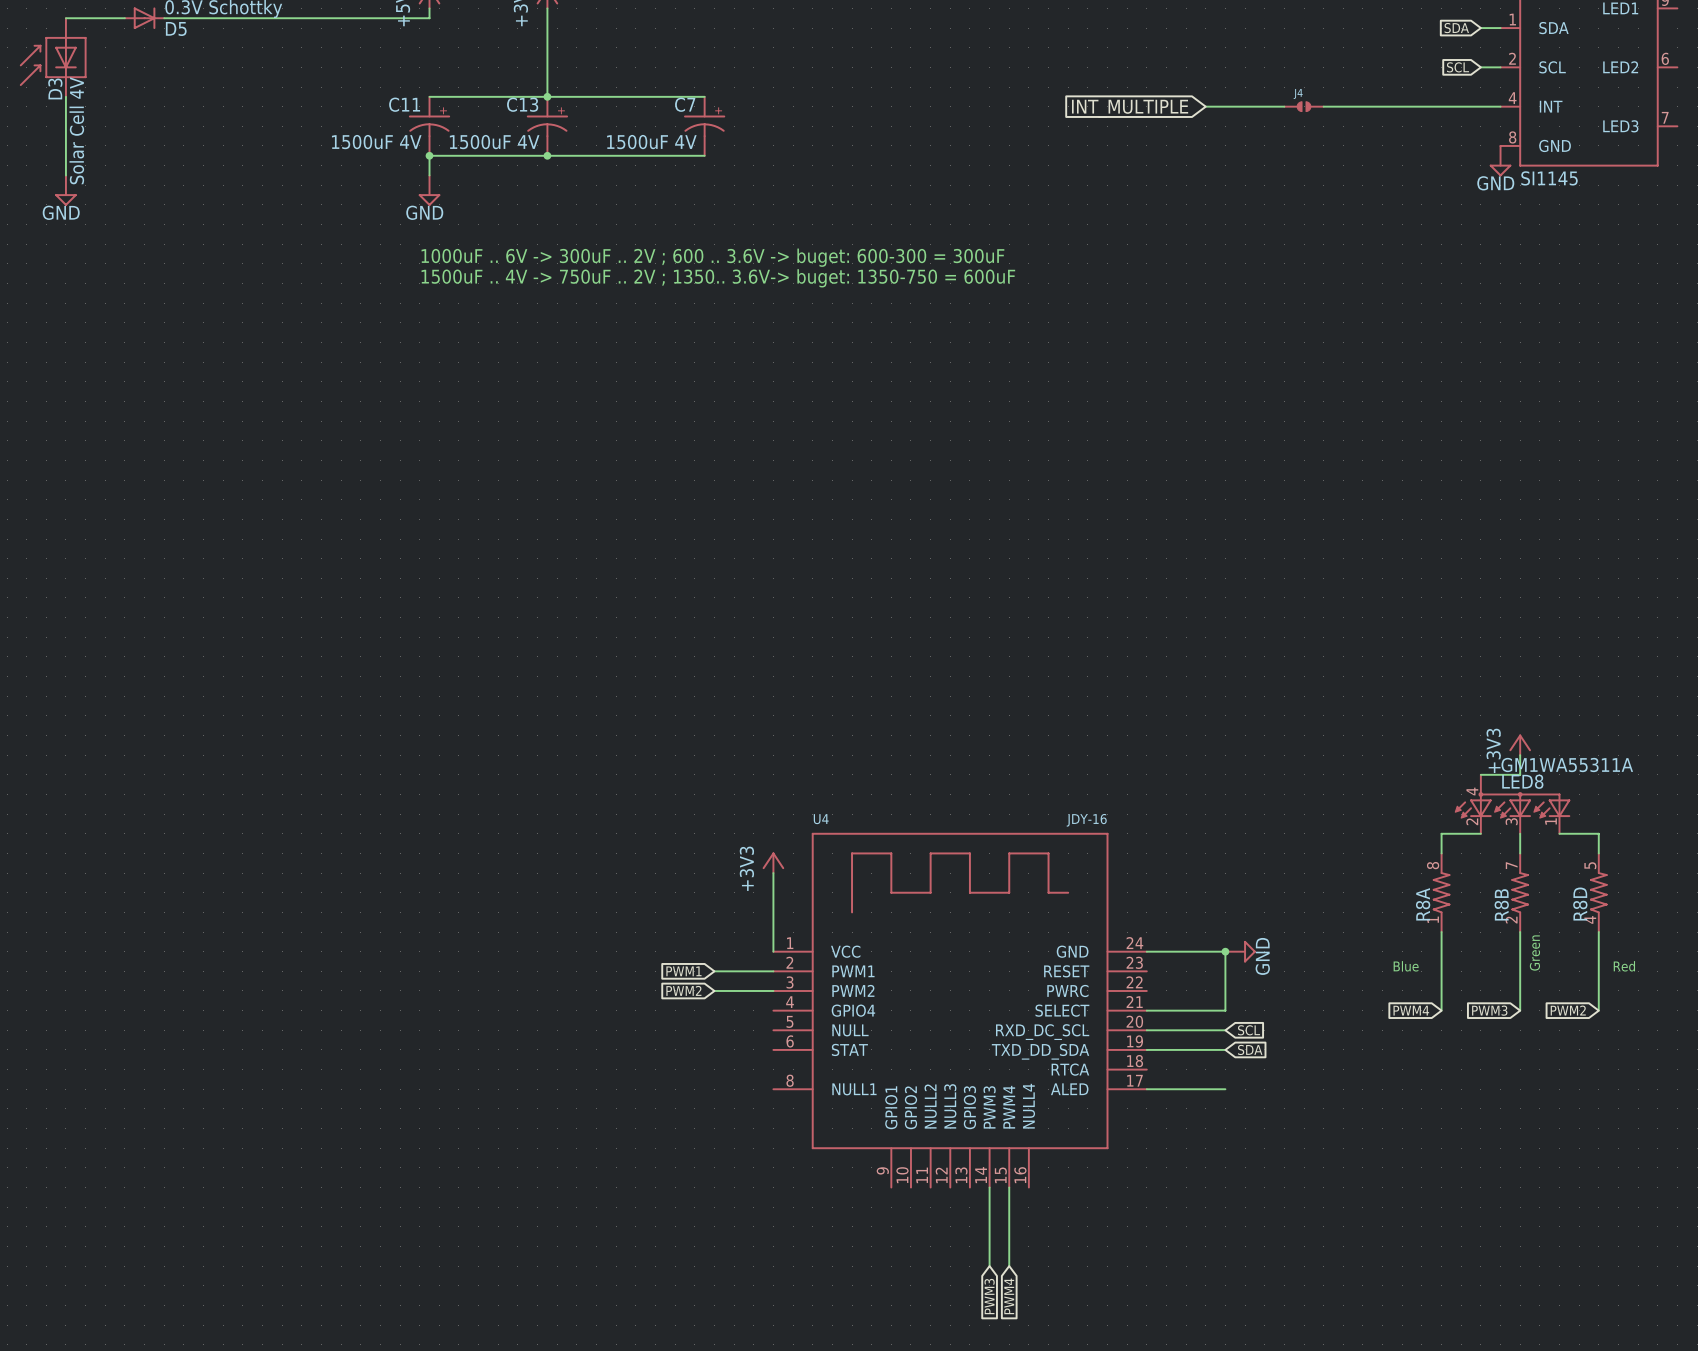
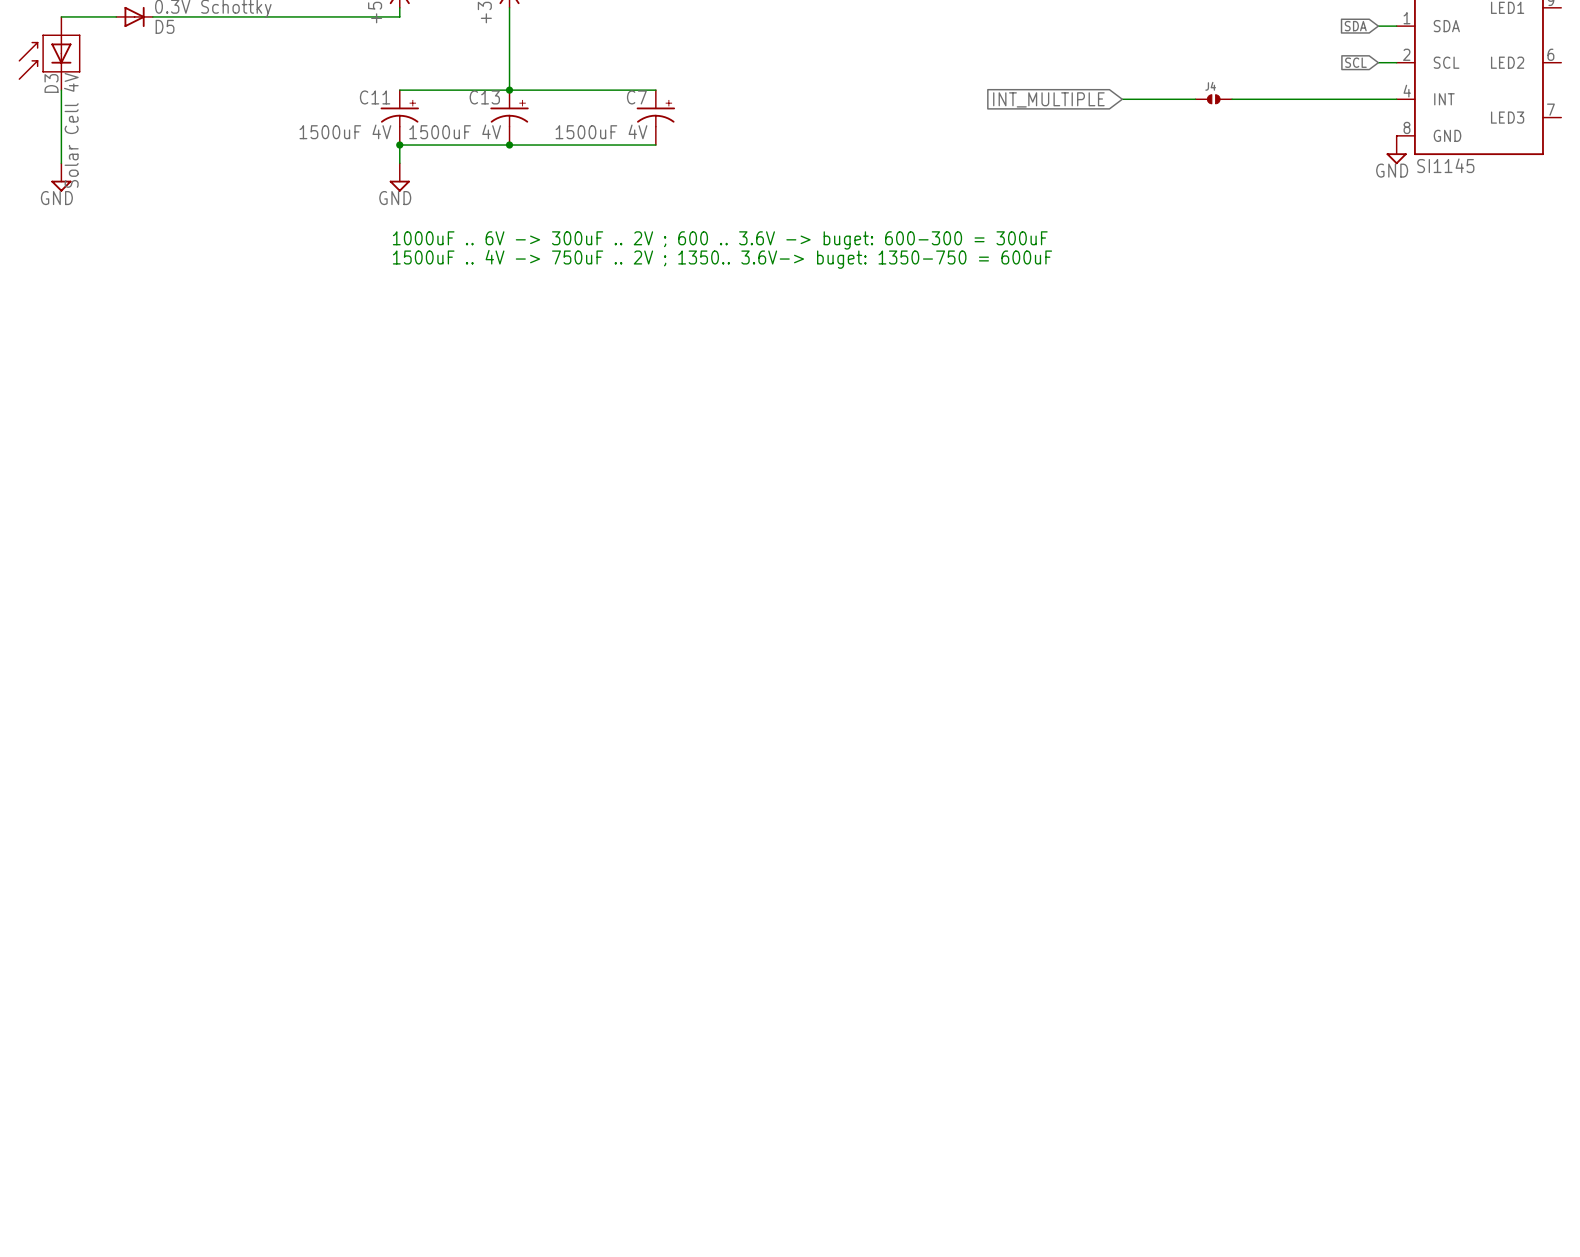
power symbol: +3V3 (1520, 744) -> none
wire: (1520, 755) (1520, 774) (1480, 774) -> none
LED8: GM1WA55311A (1512, 804) -> none
wire: (1480, 833) (1441, 833) (1441, 853) -> none
wire: (1520, 833) (1520, 853) -> none
wire: (1559, 833) (1598, 833) (1598, 853) -> none
power symbol: +3V3 (773, 862) -> none
wire: (773, 873) (773, 951) -> none
R8A: (1441, 892) -> none
R8B: (1520, 892) -> none
R8D: (1598, 892) -> none
wire: (1441, 932) (1441, 1010) -> none
wire: (1520, 932) (1520, 1010) -> none
wire: (1598, 932) (1598, 1010) -> none
wire: (1146, 951) (1225, 951) (1225, 1010) (1146, 1010) -> none
junction: (1225, 951) -> none
power symbol: GND (1240, 951) -> none
text: Green (1534, 953) -> none
text: Blue (1406, 966) -> none
text: Red (1624, 966) -> none
global label: PWM1 (683, 971) -> none
wire: (714, 971) (773, 971) -> none
global label: PWM2 (683, 990) -> none
wire: (714, 990) (773, 990) -> none
U4: JDY-16 (960, 1010) -> none
global label: PWM4 (1411, 1010) -> none
global label: PWM3 (1489, 1010) -> none
global label: PWM2 (1568, 1010) -> none
wire: (1146, 1030) (1225, 1030) -> none
global label: SCL (1249, 1030) -> none
wire: (1146, 1049) (1225, 1049) -> none
global label: SDA (1250, 1049) -> none
wire: (1146, 1089) (1225, 1089) -> none
wire: (989, 1187) (989, 1266) -> none
wire: (1009, 1187) (1009, 1266) -> none
global label: PWM3 (989, 1296) -> none
global label: PWM4 (1009, 1296) -> none

